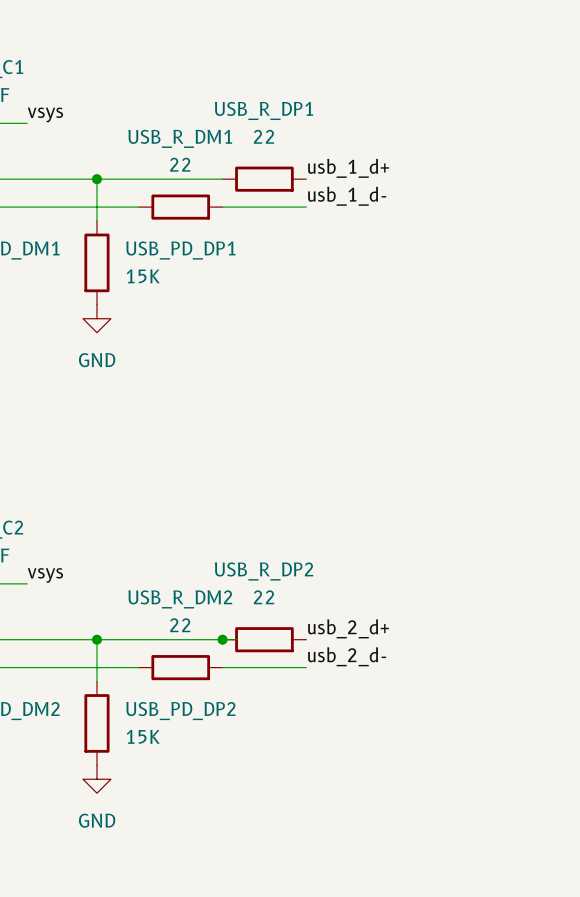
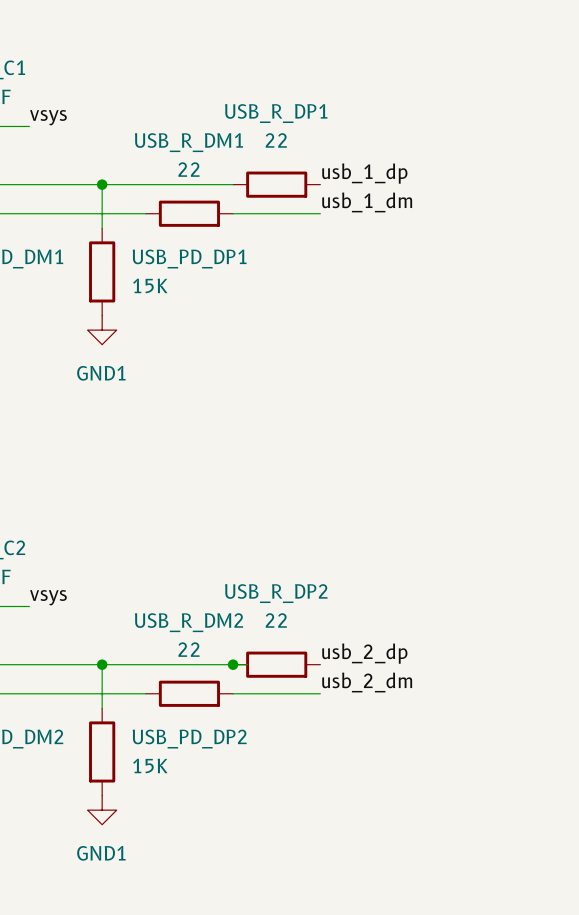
label: usb_1_d+ (348, 168) -> usb_1_dp (364, 173)
label: usb_1_d- (347, 196) -> usb_1_dm (367, 202)
power symbol: GND (96, 318) -> GND1 (102, 330)
label: usb_2_d+ (348, 628) -> usb_2_dp (364, 653)
label: usb_2_d- (347, 656) -> usb_2_dm (367, 682)
power symbol: GND (96, 779) -> GND1 (102, 810)

